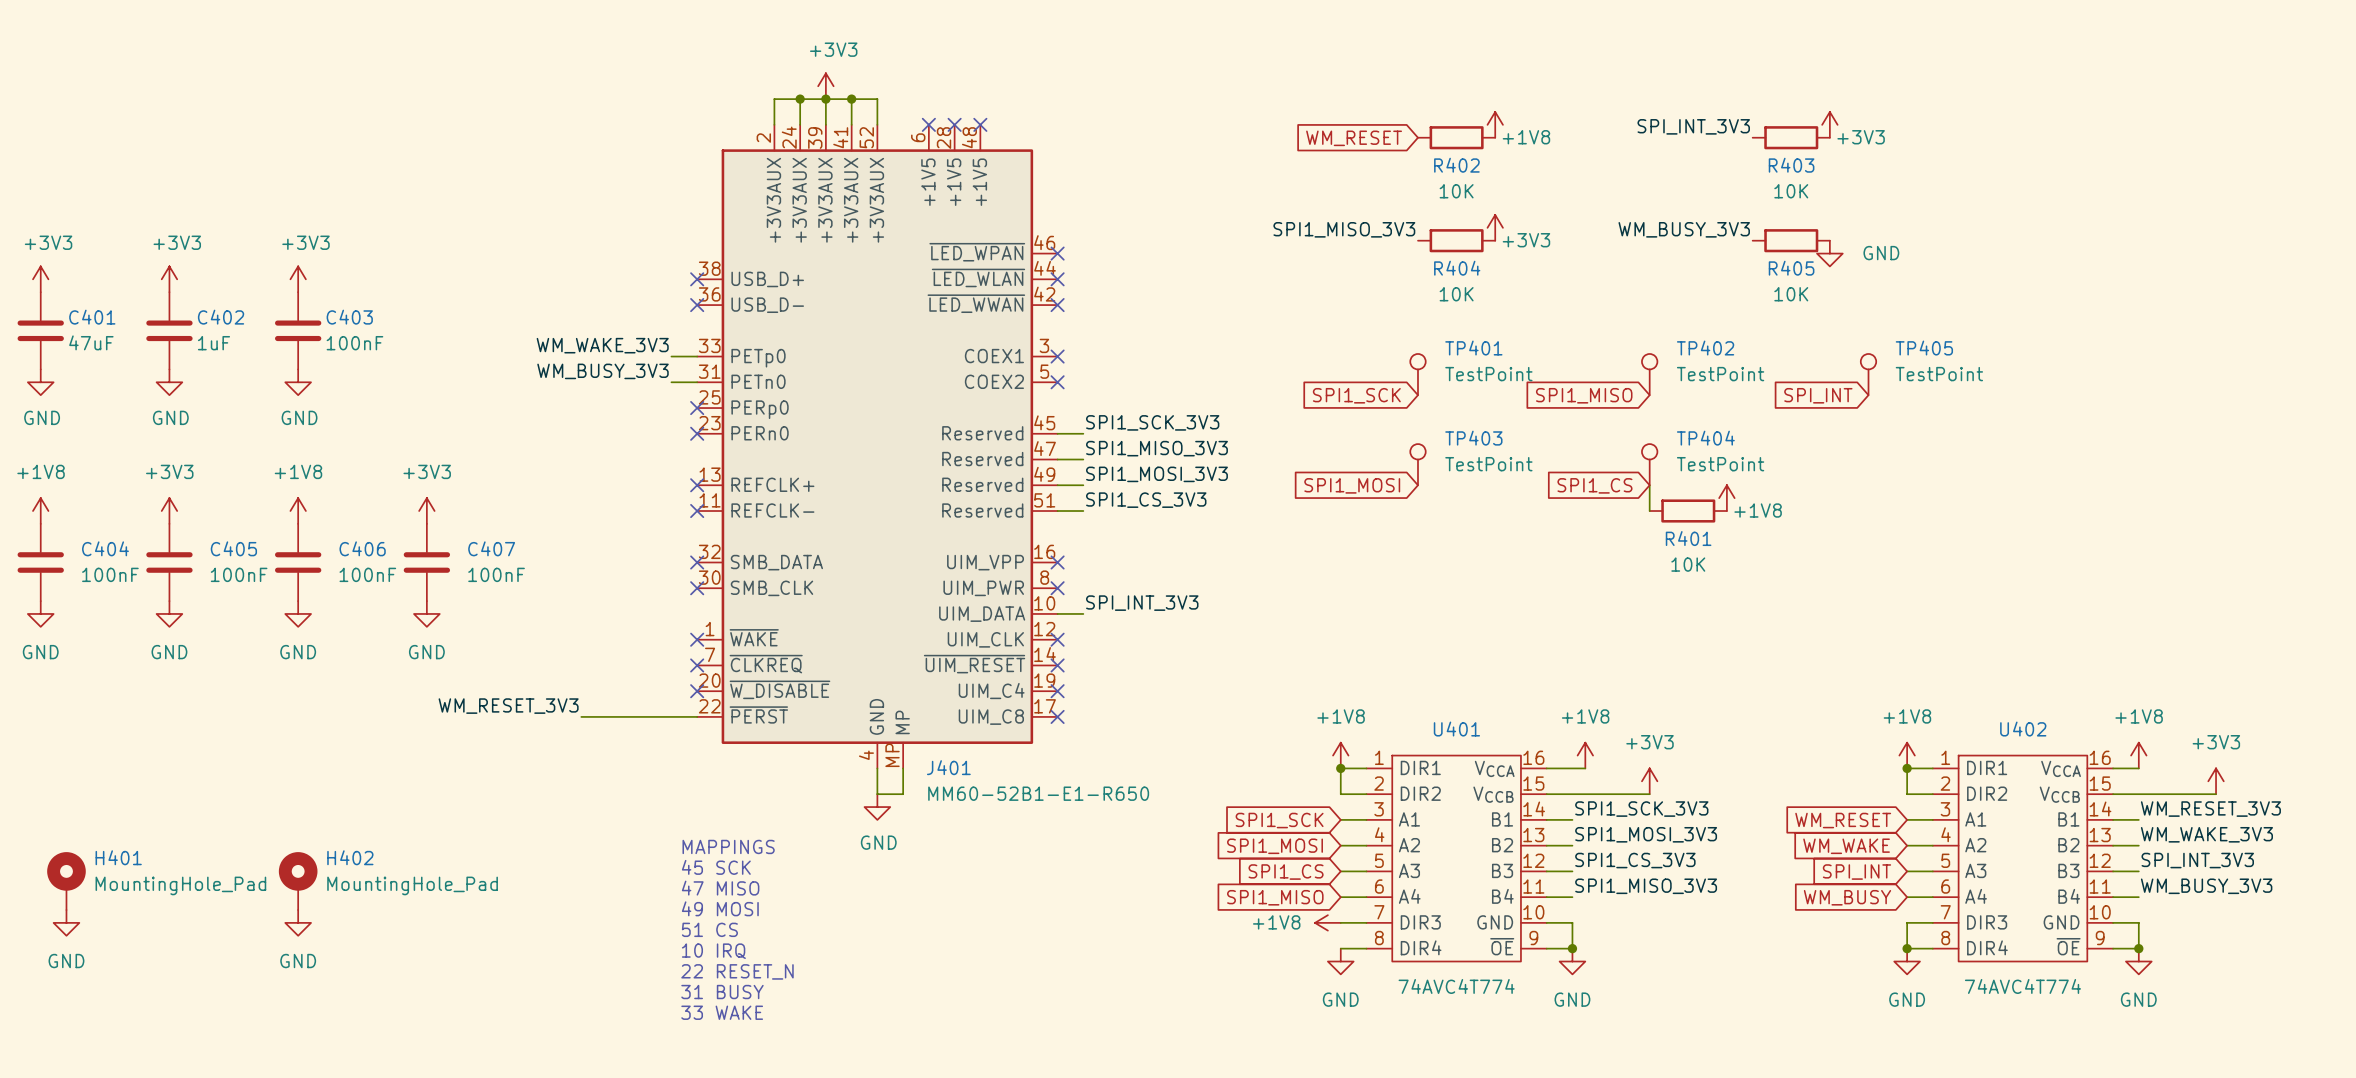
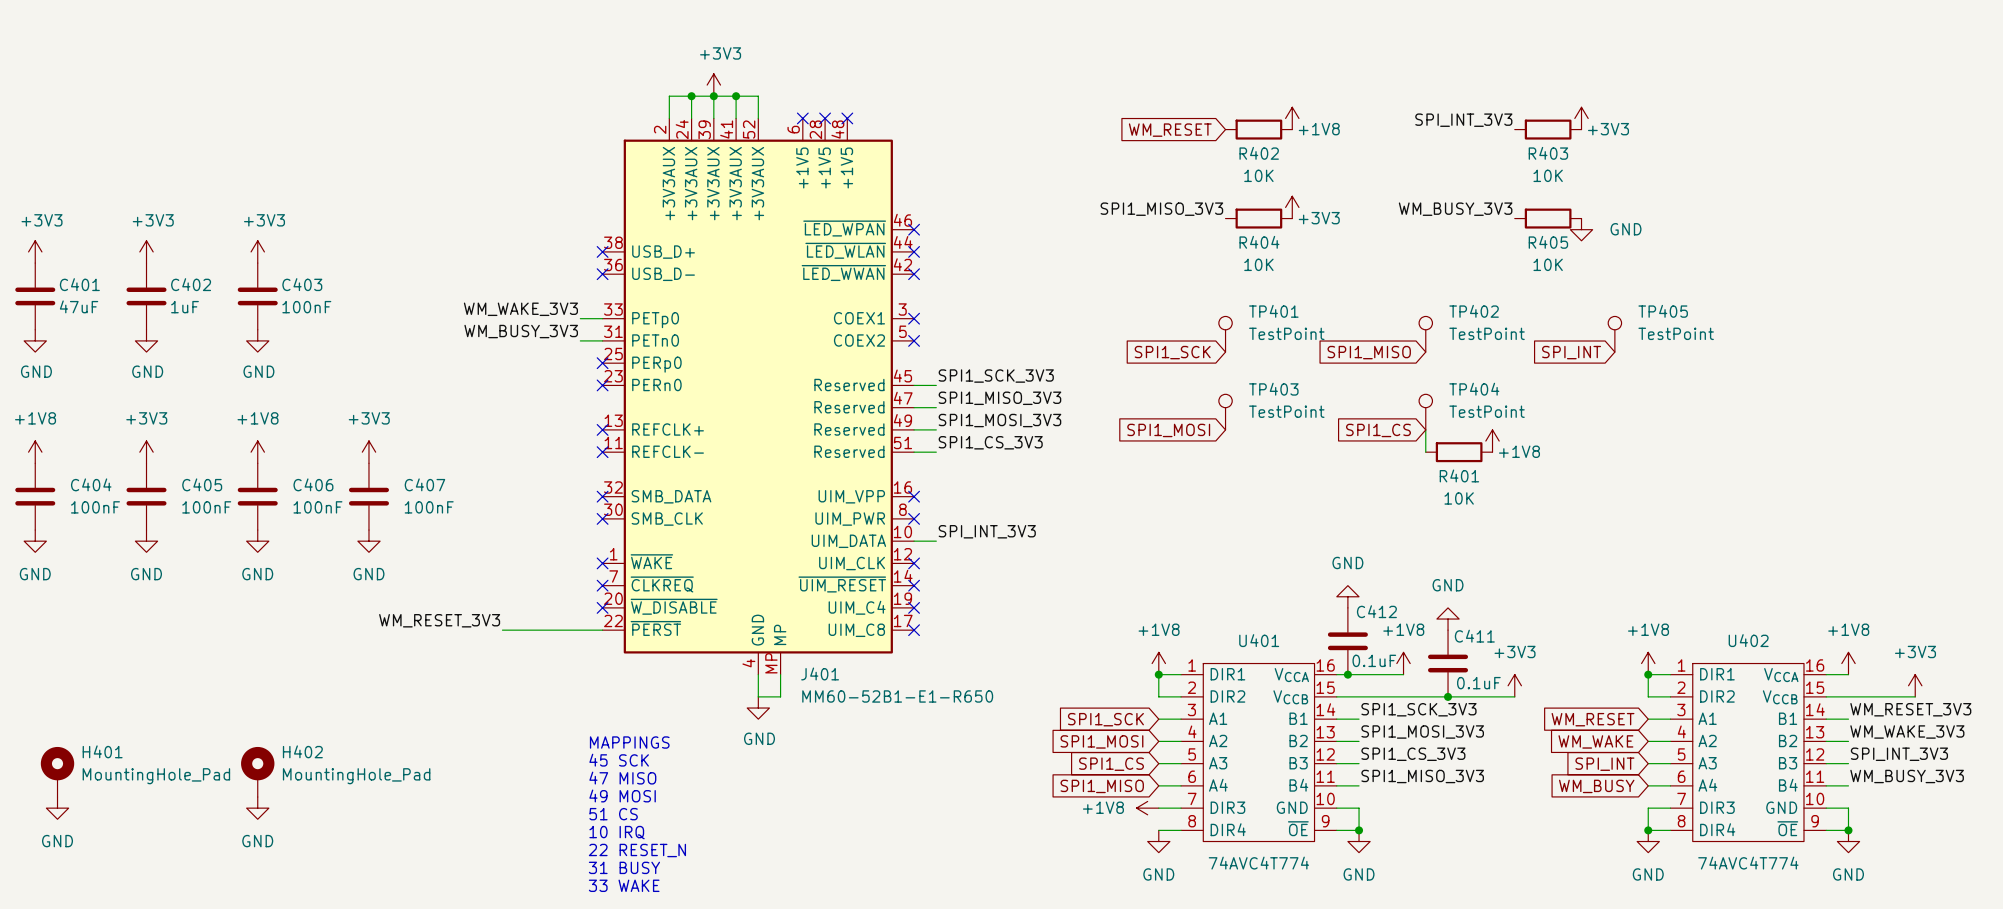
power symbol: none -> GND (1347, 596)
power symbol: none -> GND (1448, 619)
C412: none -> 0.1uF (1347, 641)
power symbol position: +1V8 (1585, 755) -> +1V8 (1403, 663)
C411: none -> 0.1uF (1448, 663)
junction: none -> (1347, 674)
wire: none -> (1370, 674) (1403, 674)
power symbol position: +3V3 (1649, 781) -> +3V3 (1514, 685)
wire: none -> (1425, 696) (1514, 696)
junction: none -> (1448, 696)

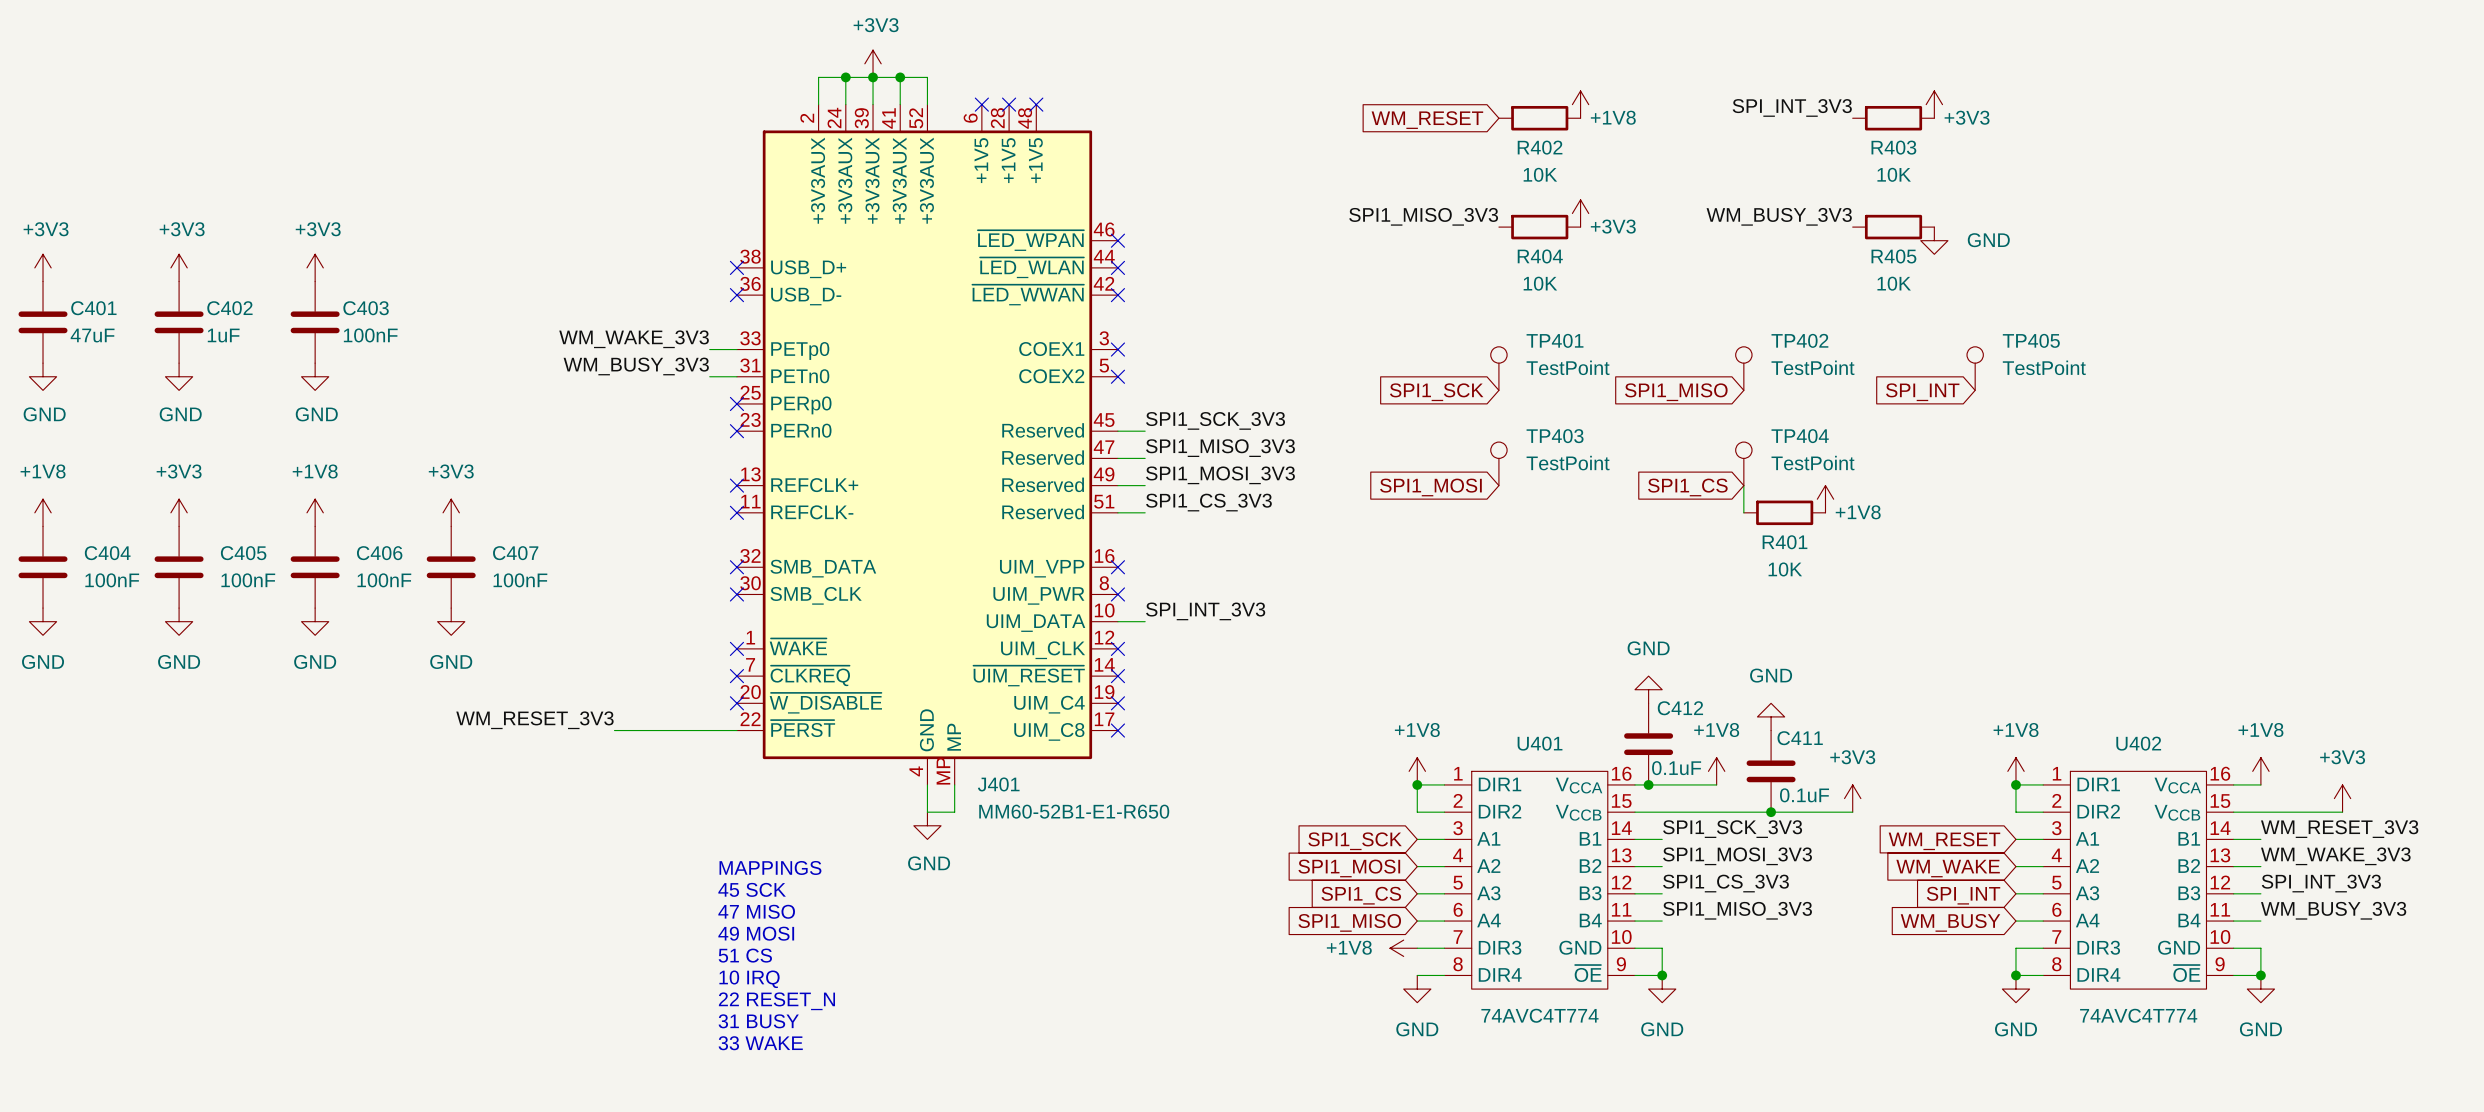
H401: MountingHole_Pad (57, 771) -> none
H402: MountingHole_Pad (257, 771) -> none
power symbol: GND (57, 808) -> none
power symbol: GND (257, 808) -> none

